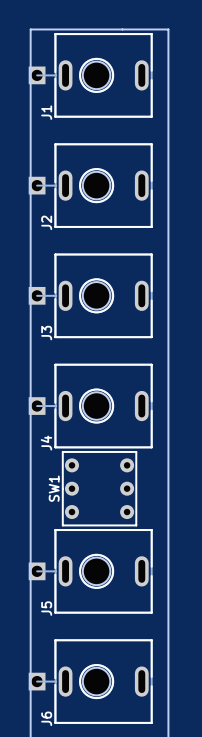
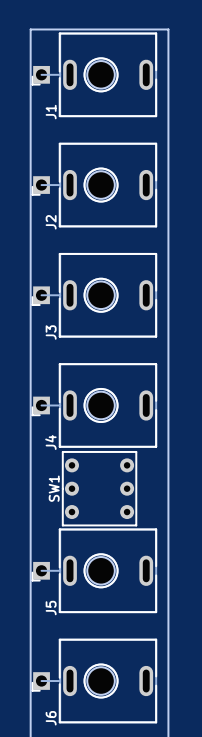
J1 footprint: [28, 33, 153, 118] -> [31, 32, 157, 117]
J2 footprint: [28, 143, 153, 228] -> [31, 143, 157, 227]
J3 footprint: [28, 253, 153, 338] -> [31, 253, 157, 338]
J4 footprint: [28, 364, 153, 448] -> [31, 363, 157, 448]
J5 footprint: [28, 529, 153, 614] -> [31, 528, 157, 613]
J6 footprint: [28, 639, 153, 724] -> [31, 639, 157, 723]

